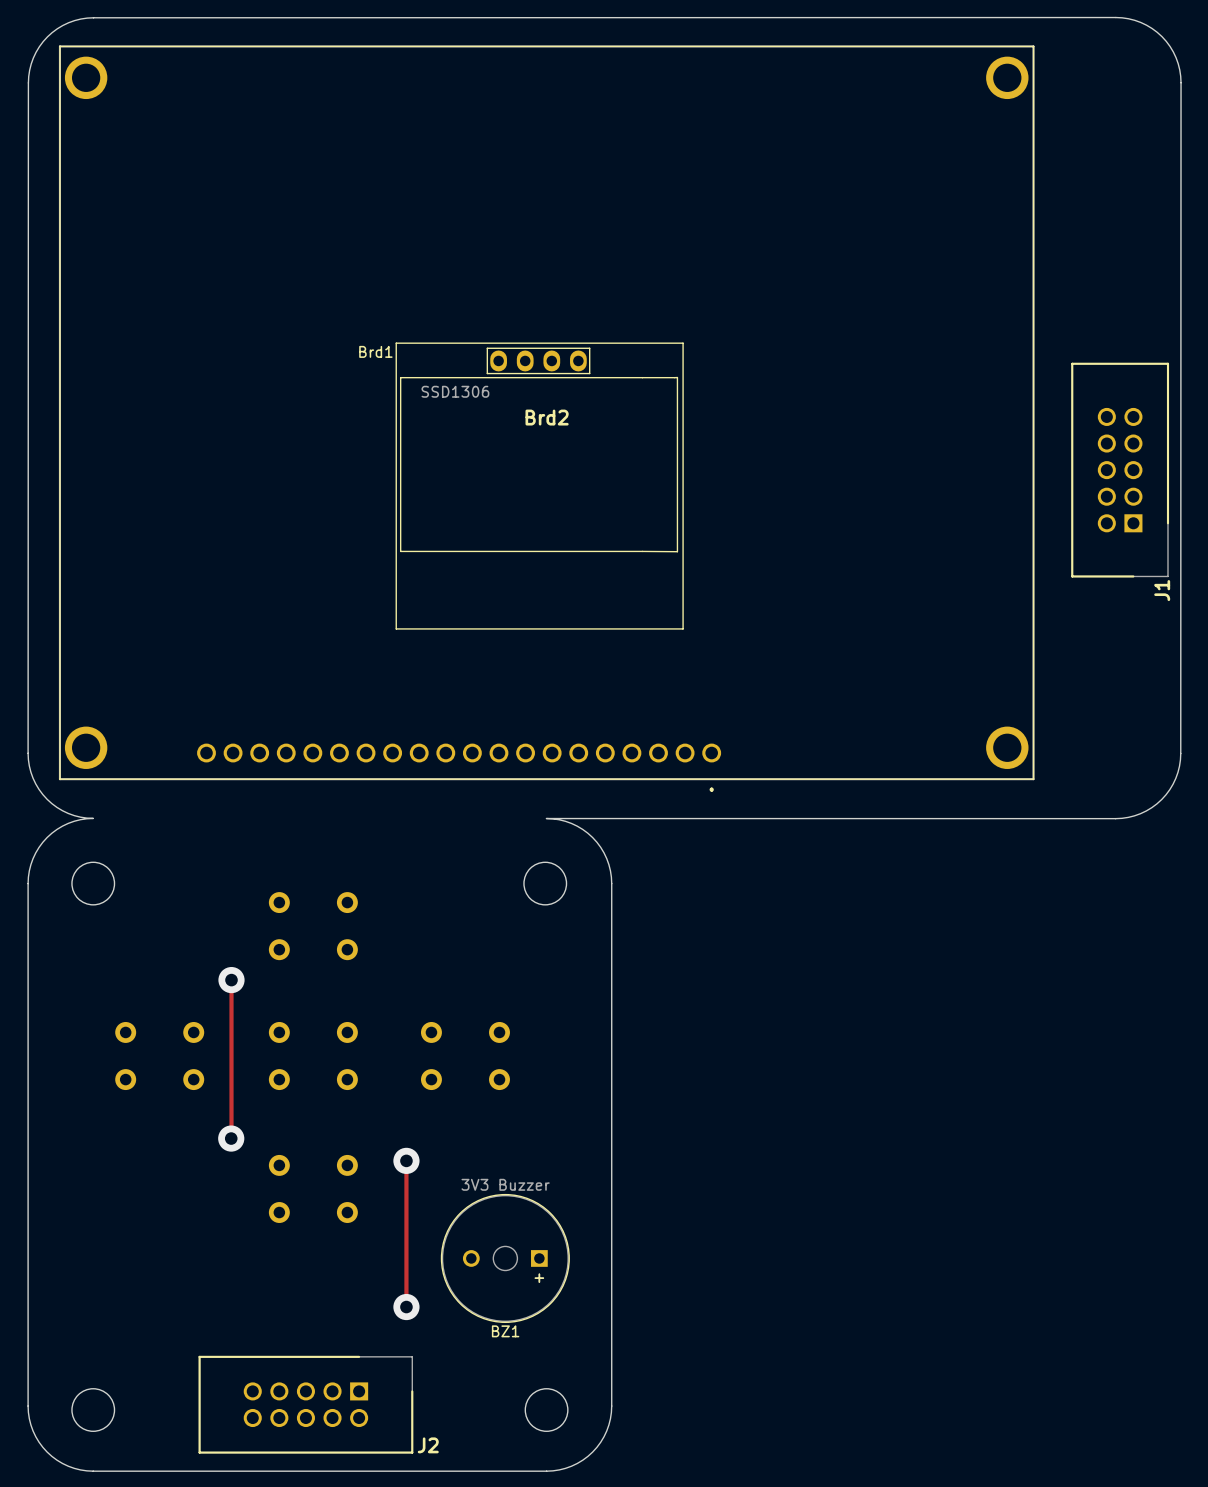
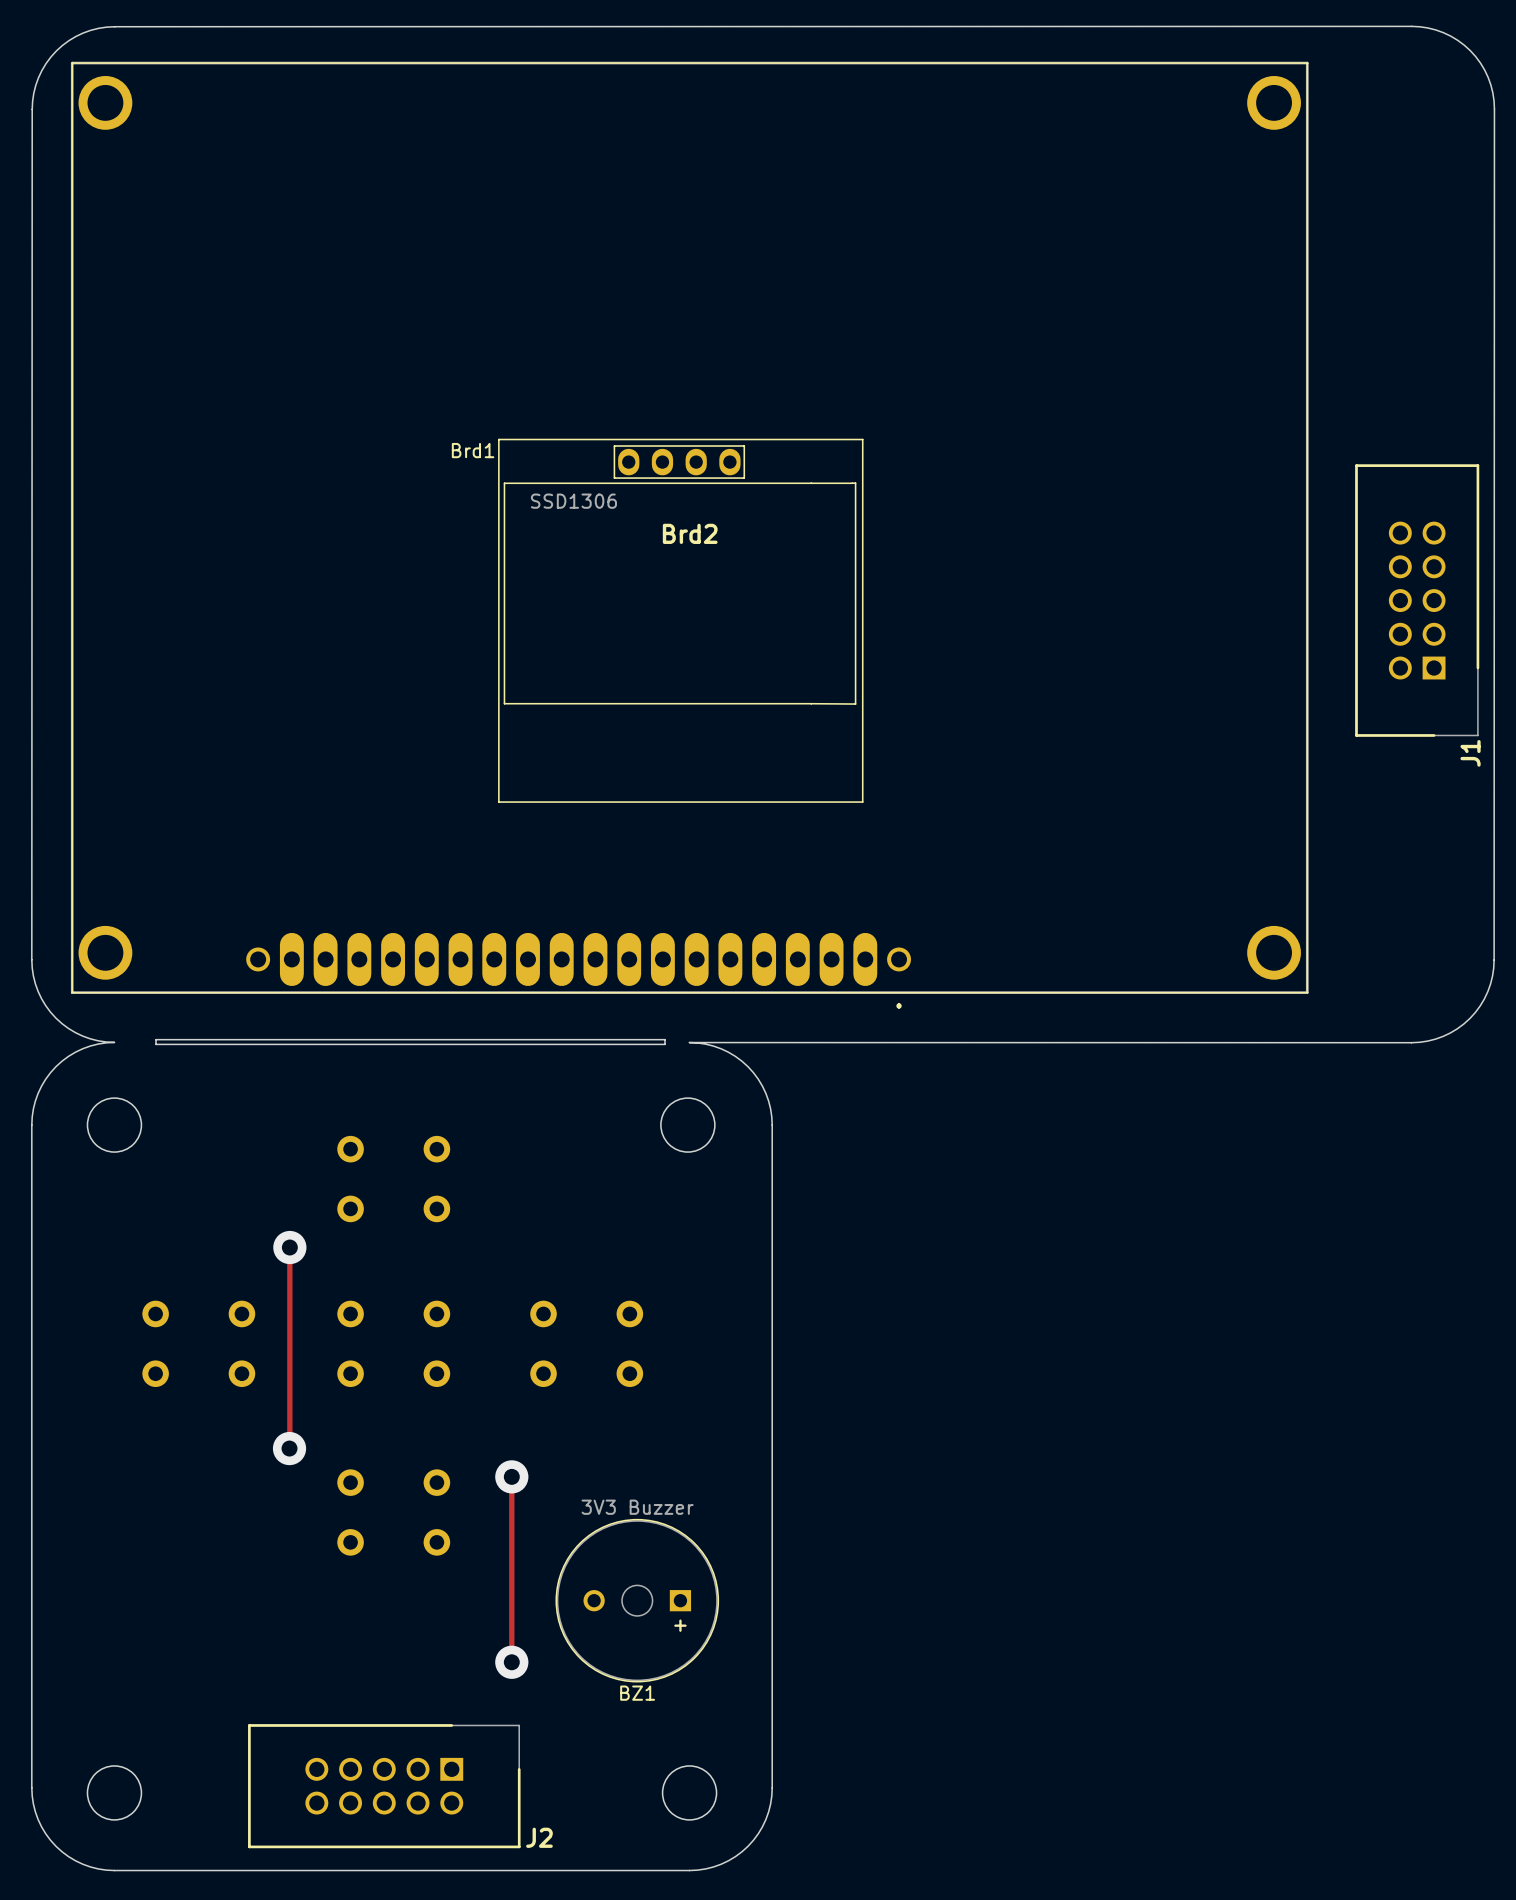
Brd2 footprint: [58, 45, 1035, 792] -> [70, 61, 1309, 1009]
board edge: none -> (156, 1039) (665, 1039) (665, 1044) (156, 1044) (156, 1039)

